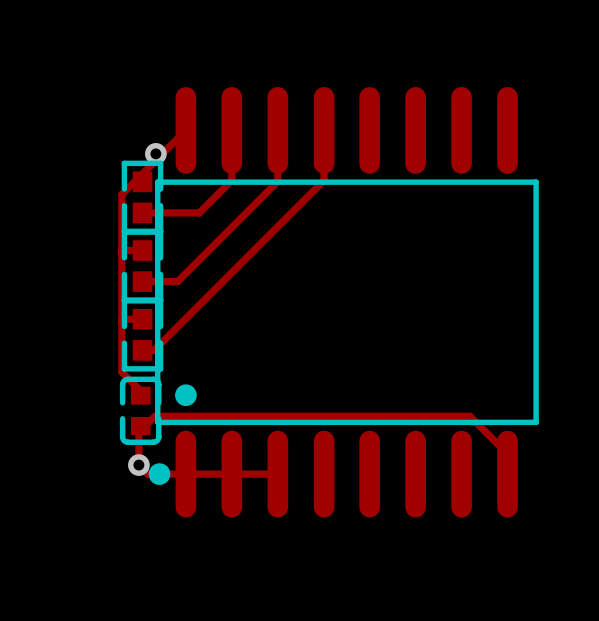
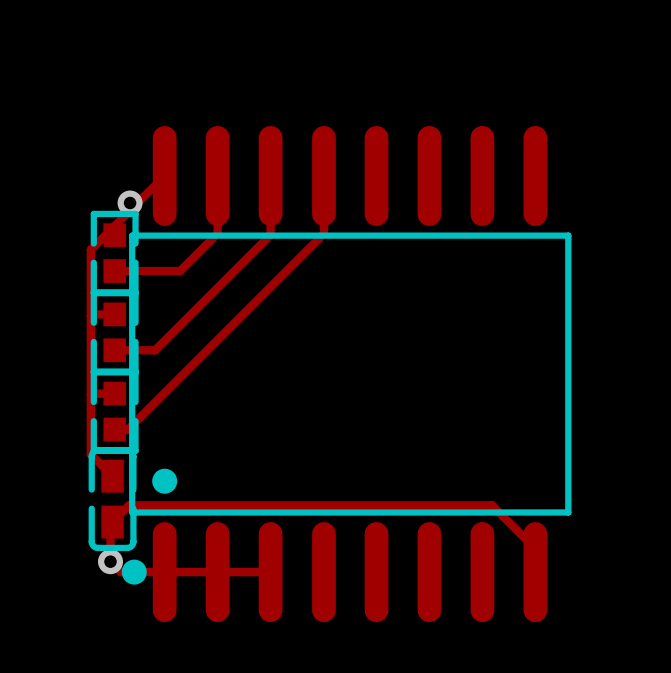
part footprint: [119, 376, 162, 445] -> [88, 447, 137, 552]

